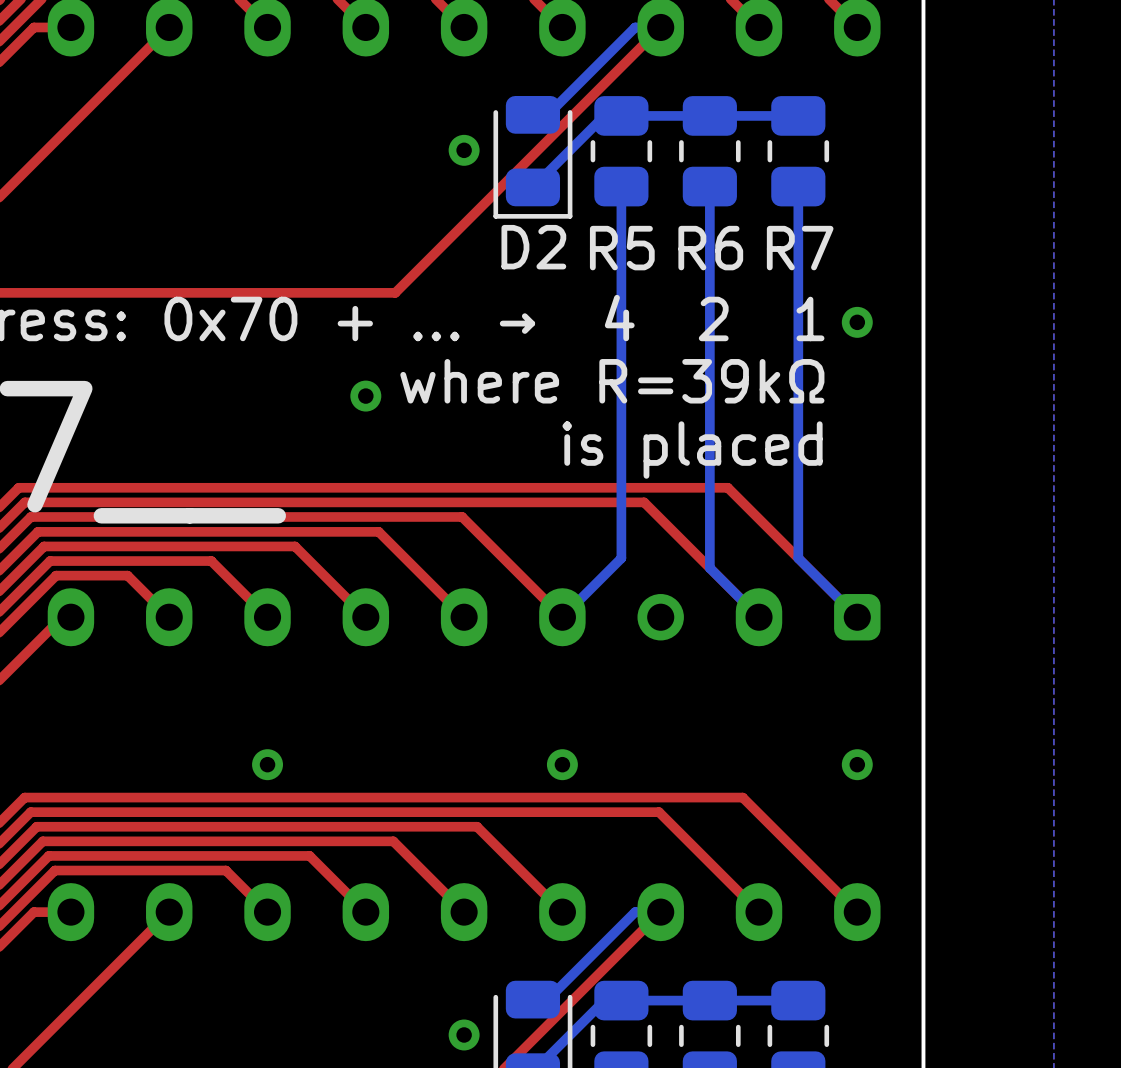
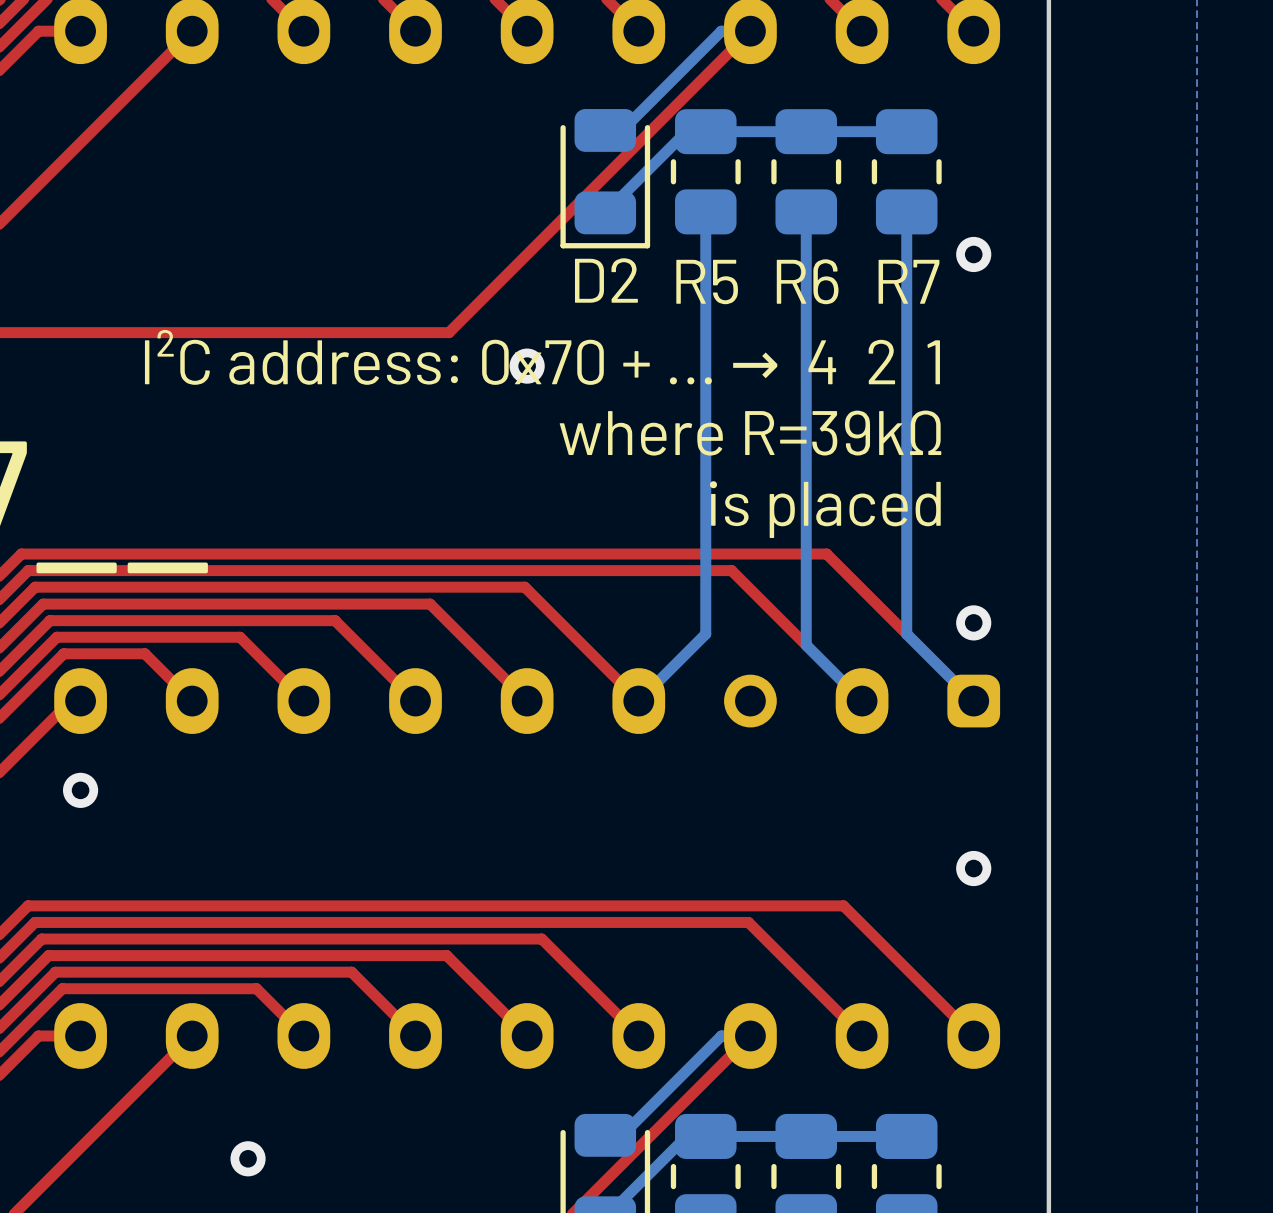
via: (464, 150) -> none
via: none -> (527, 366)
via position: (857, 322) -> (973, 254)
via: (365, 396) -> none
via: none -> (973, 622)
via: none -> (80, 790)
via: (267, 764) -> none
via: (562, 764) -> none
via: none -> (248, 1158)
via: (464, 1034) -> none

